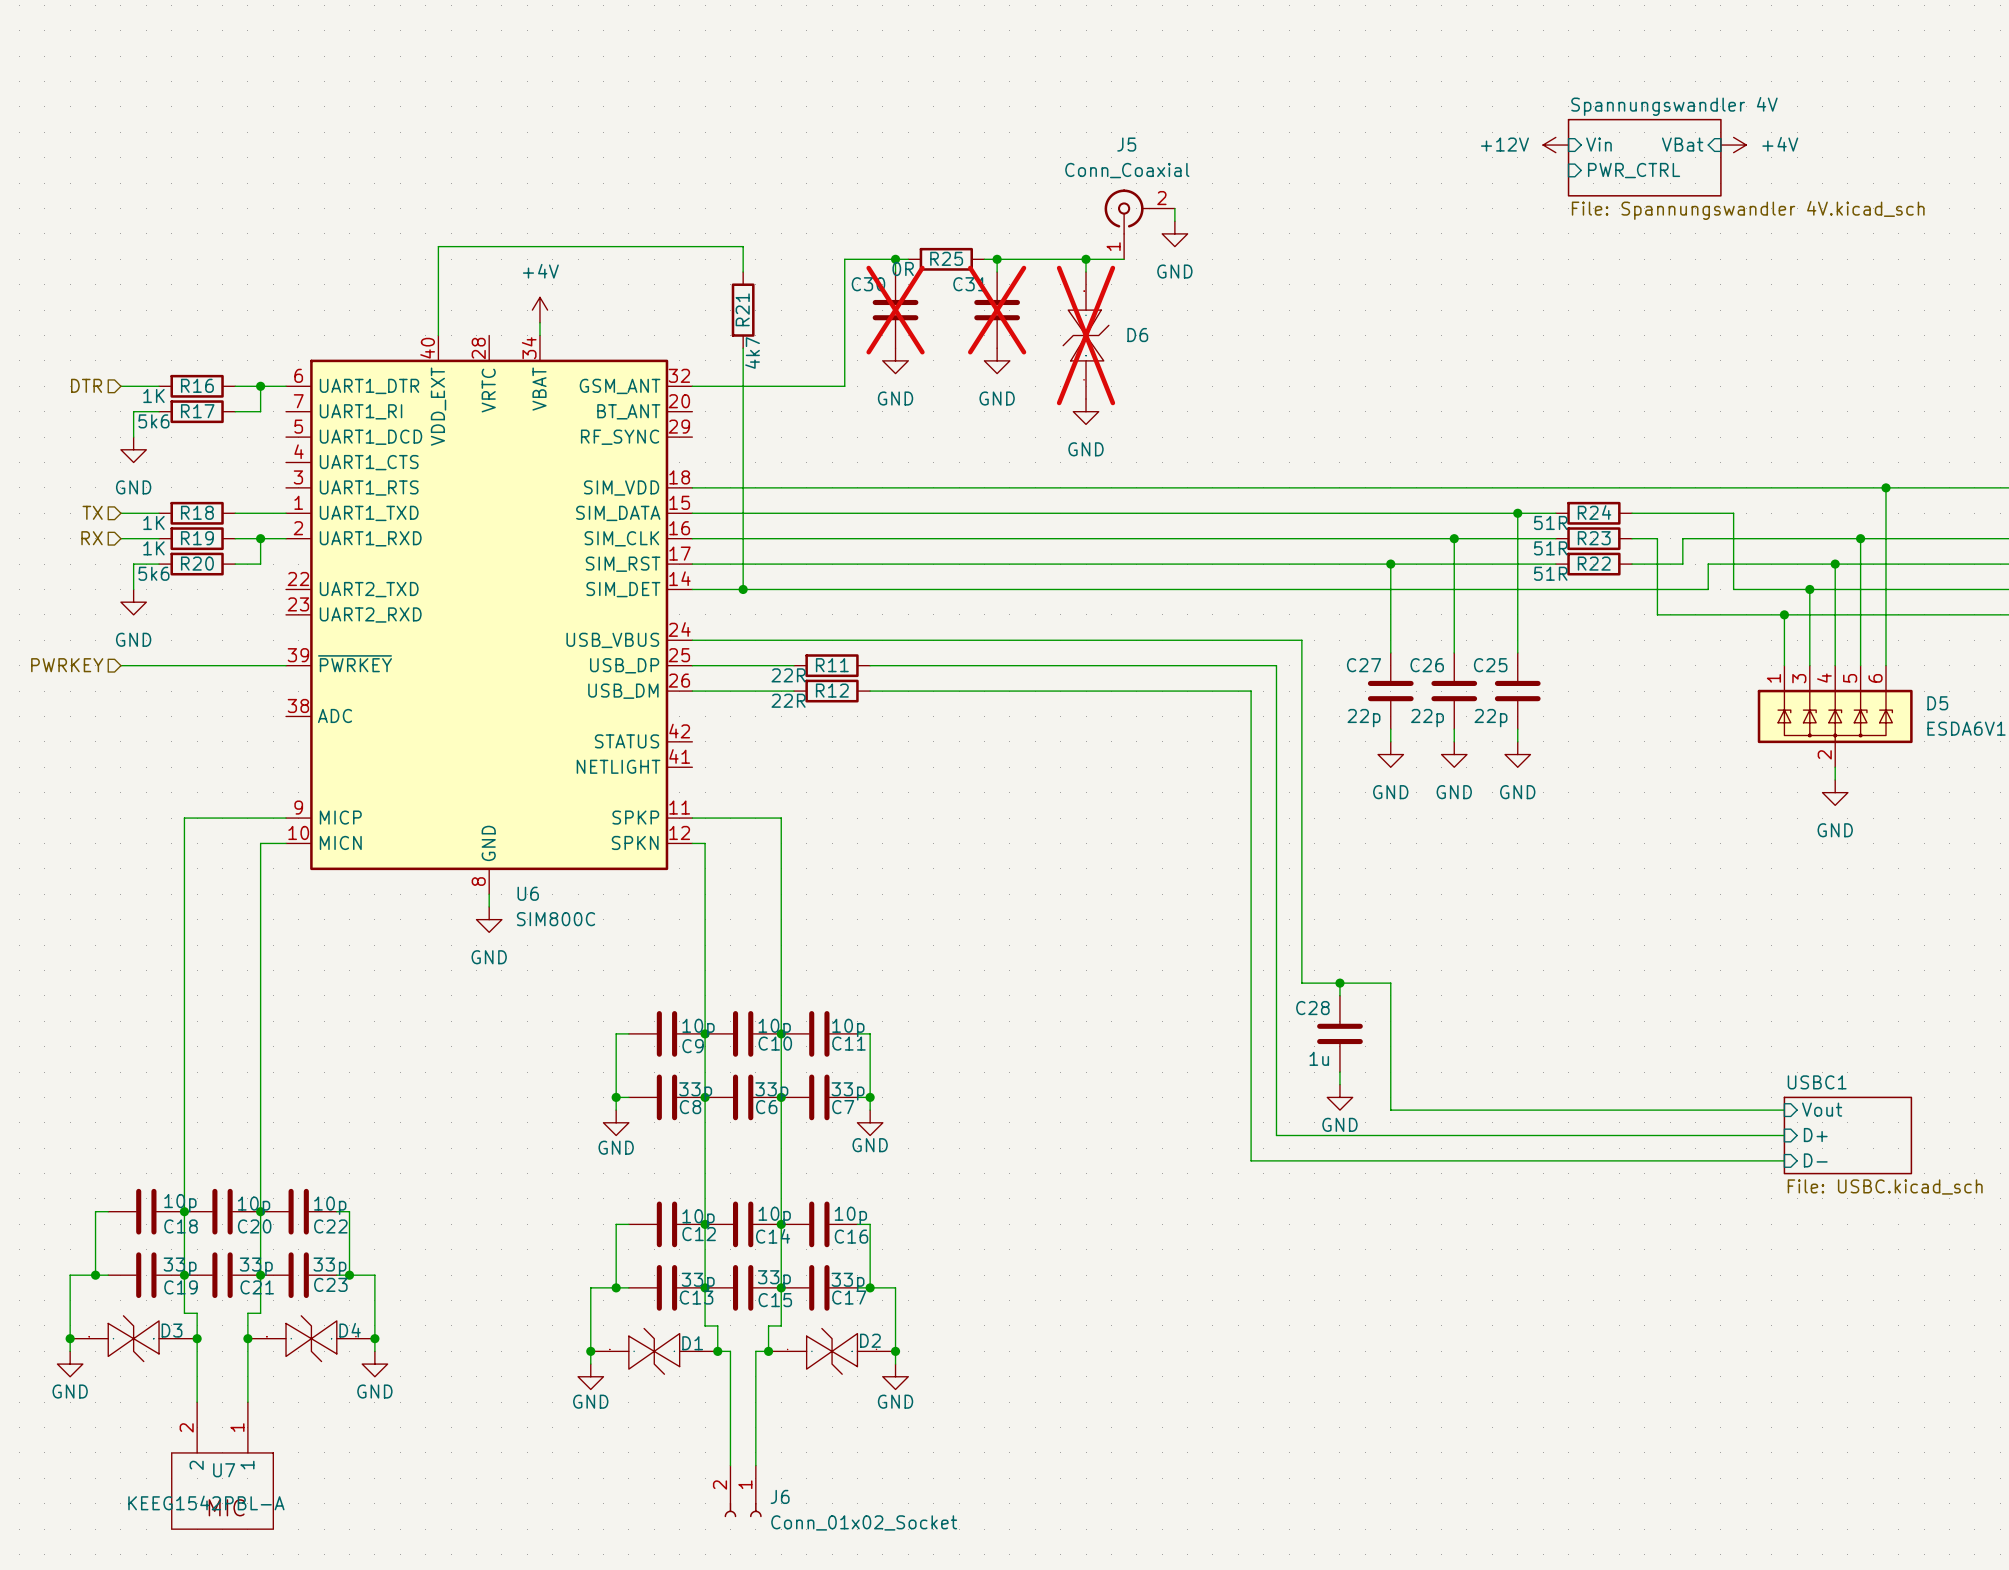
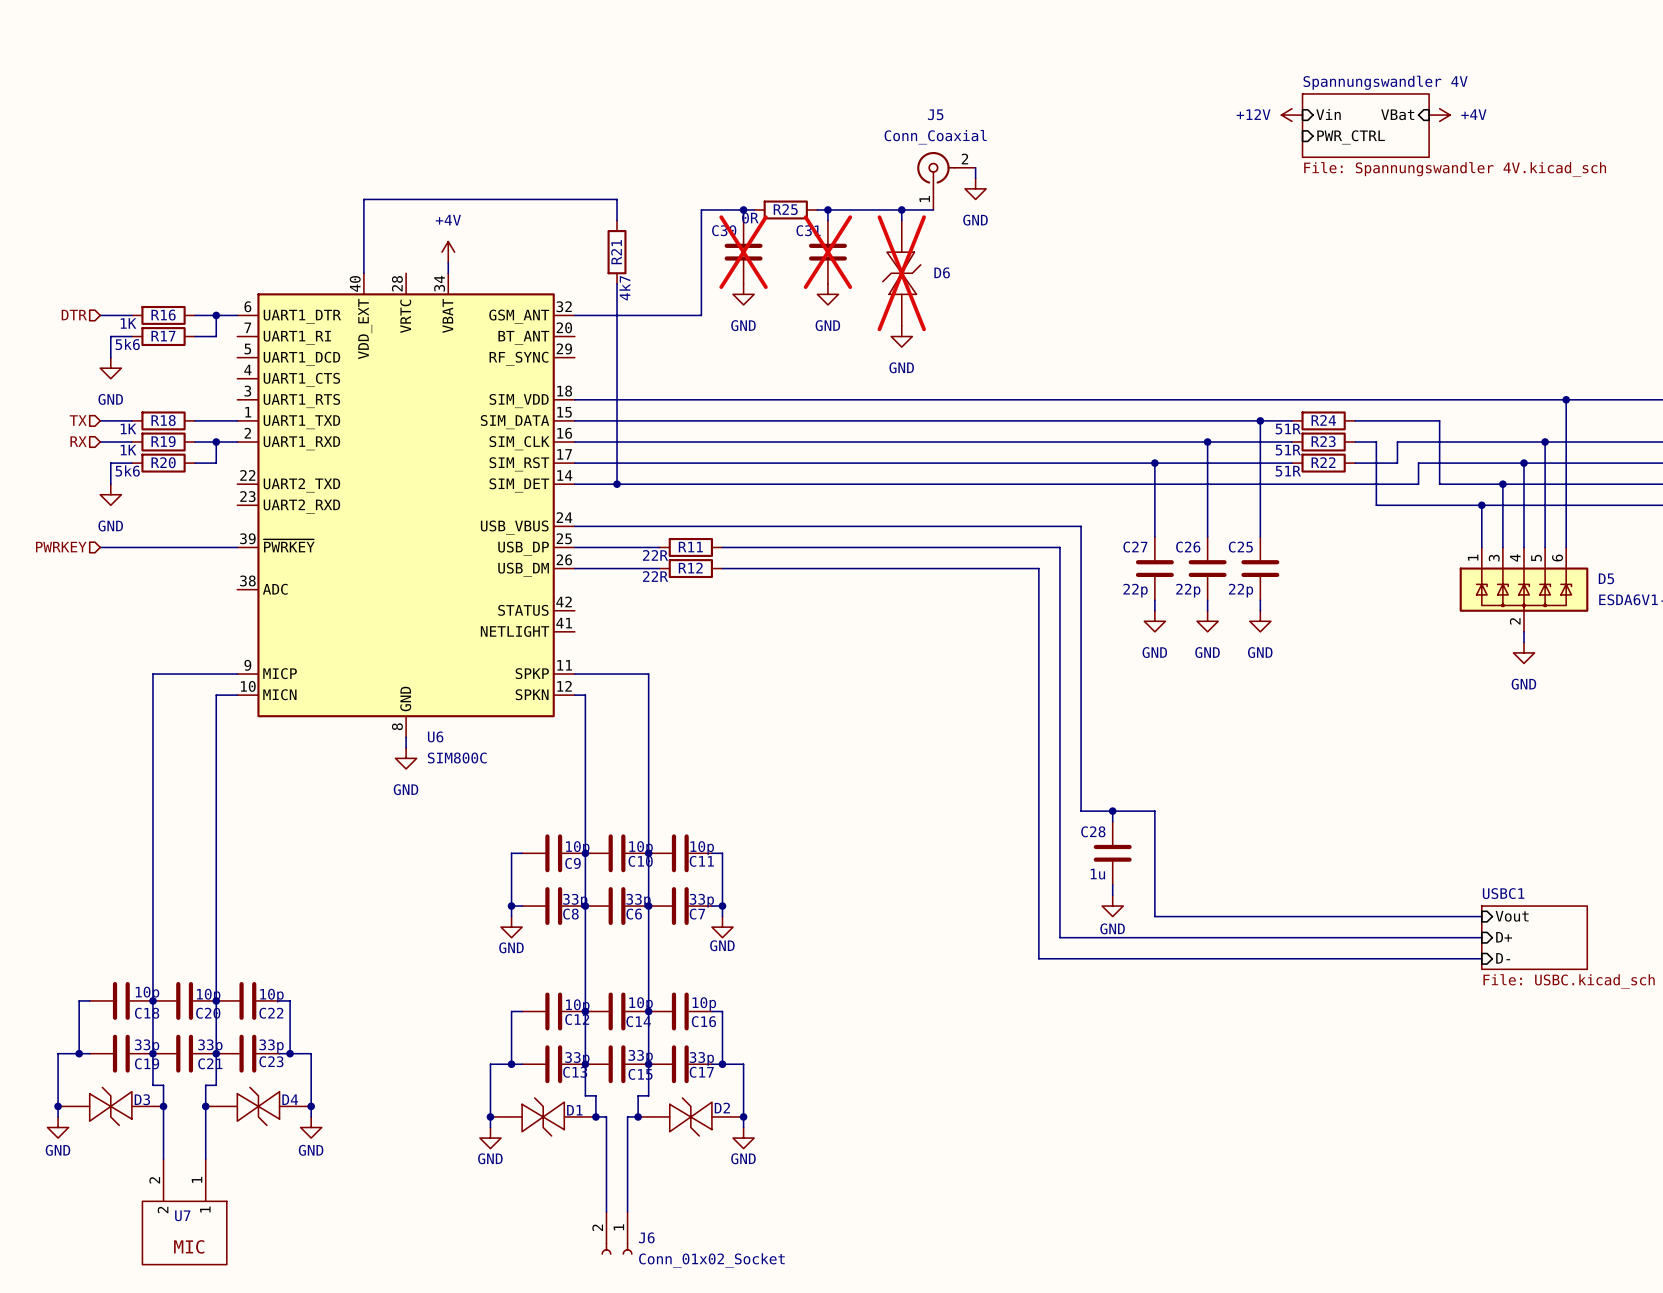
U7 value: KEEG1542PBL-A (206, 1502) -> none

